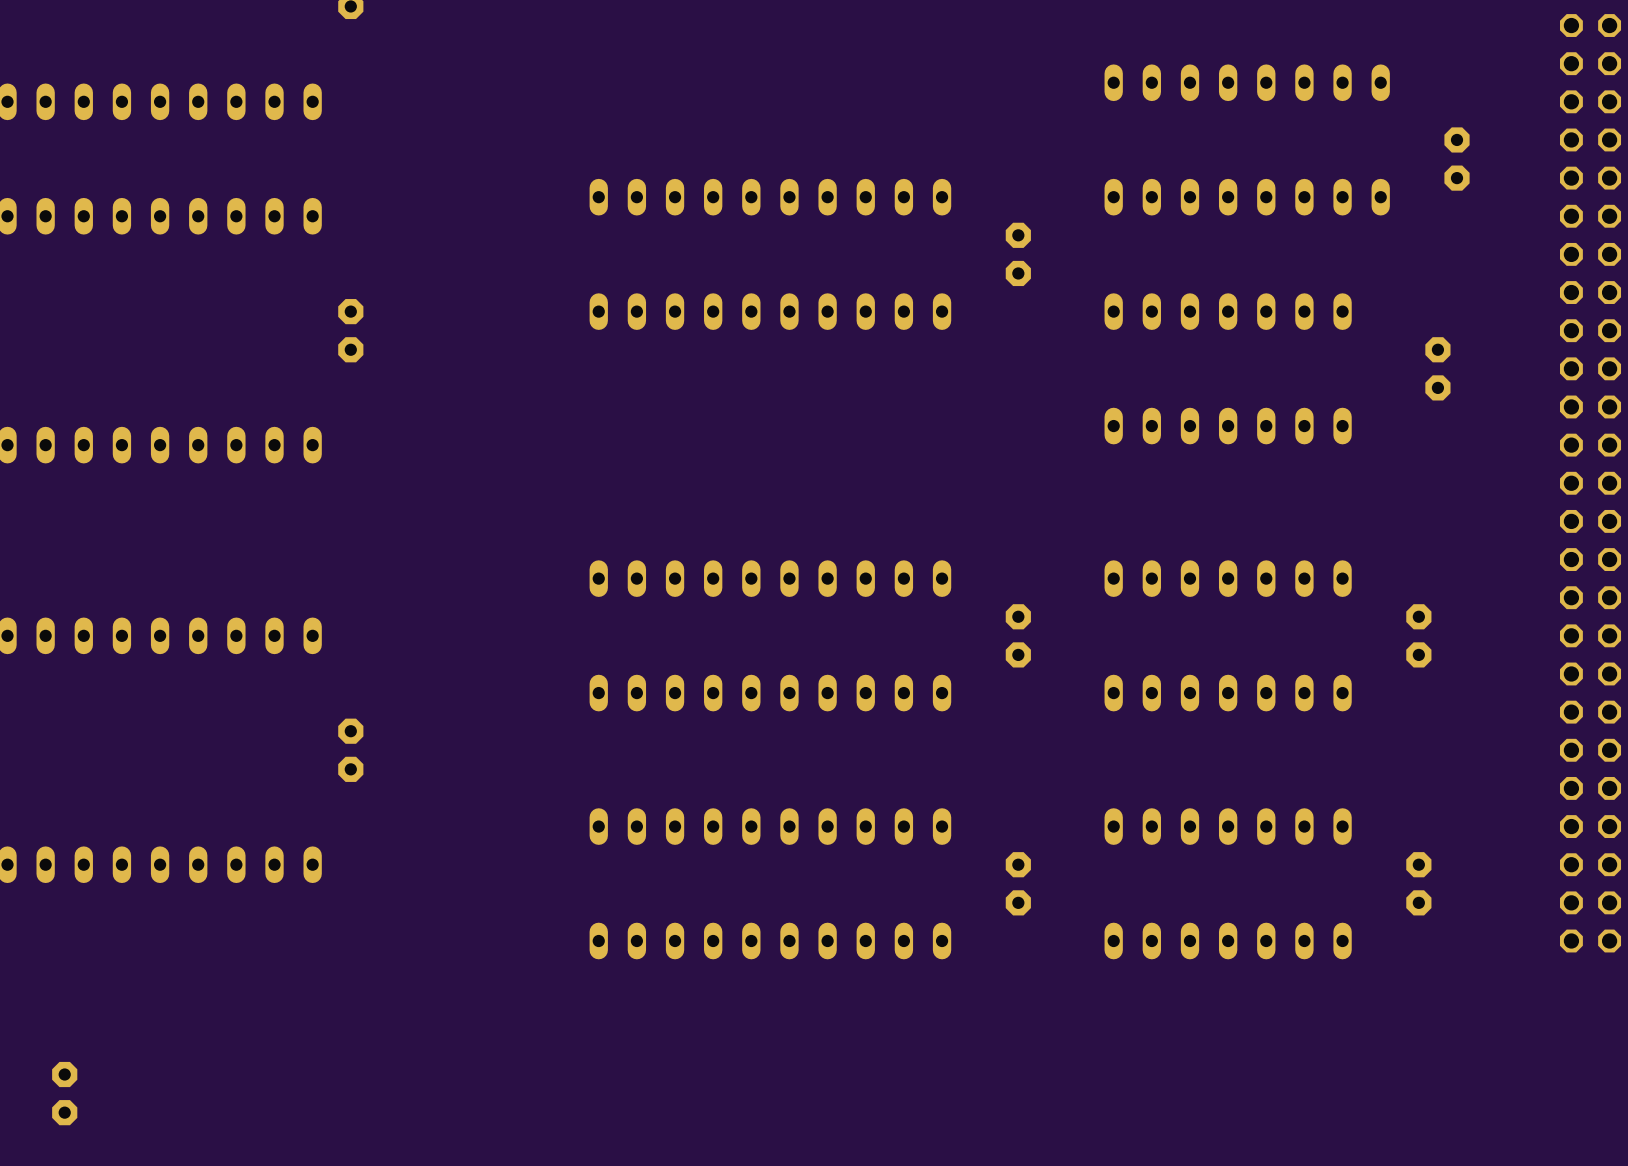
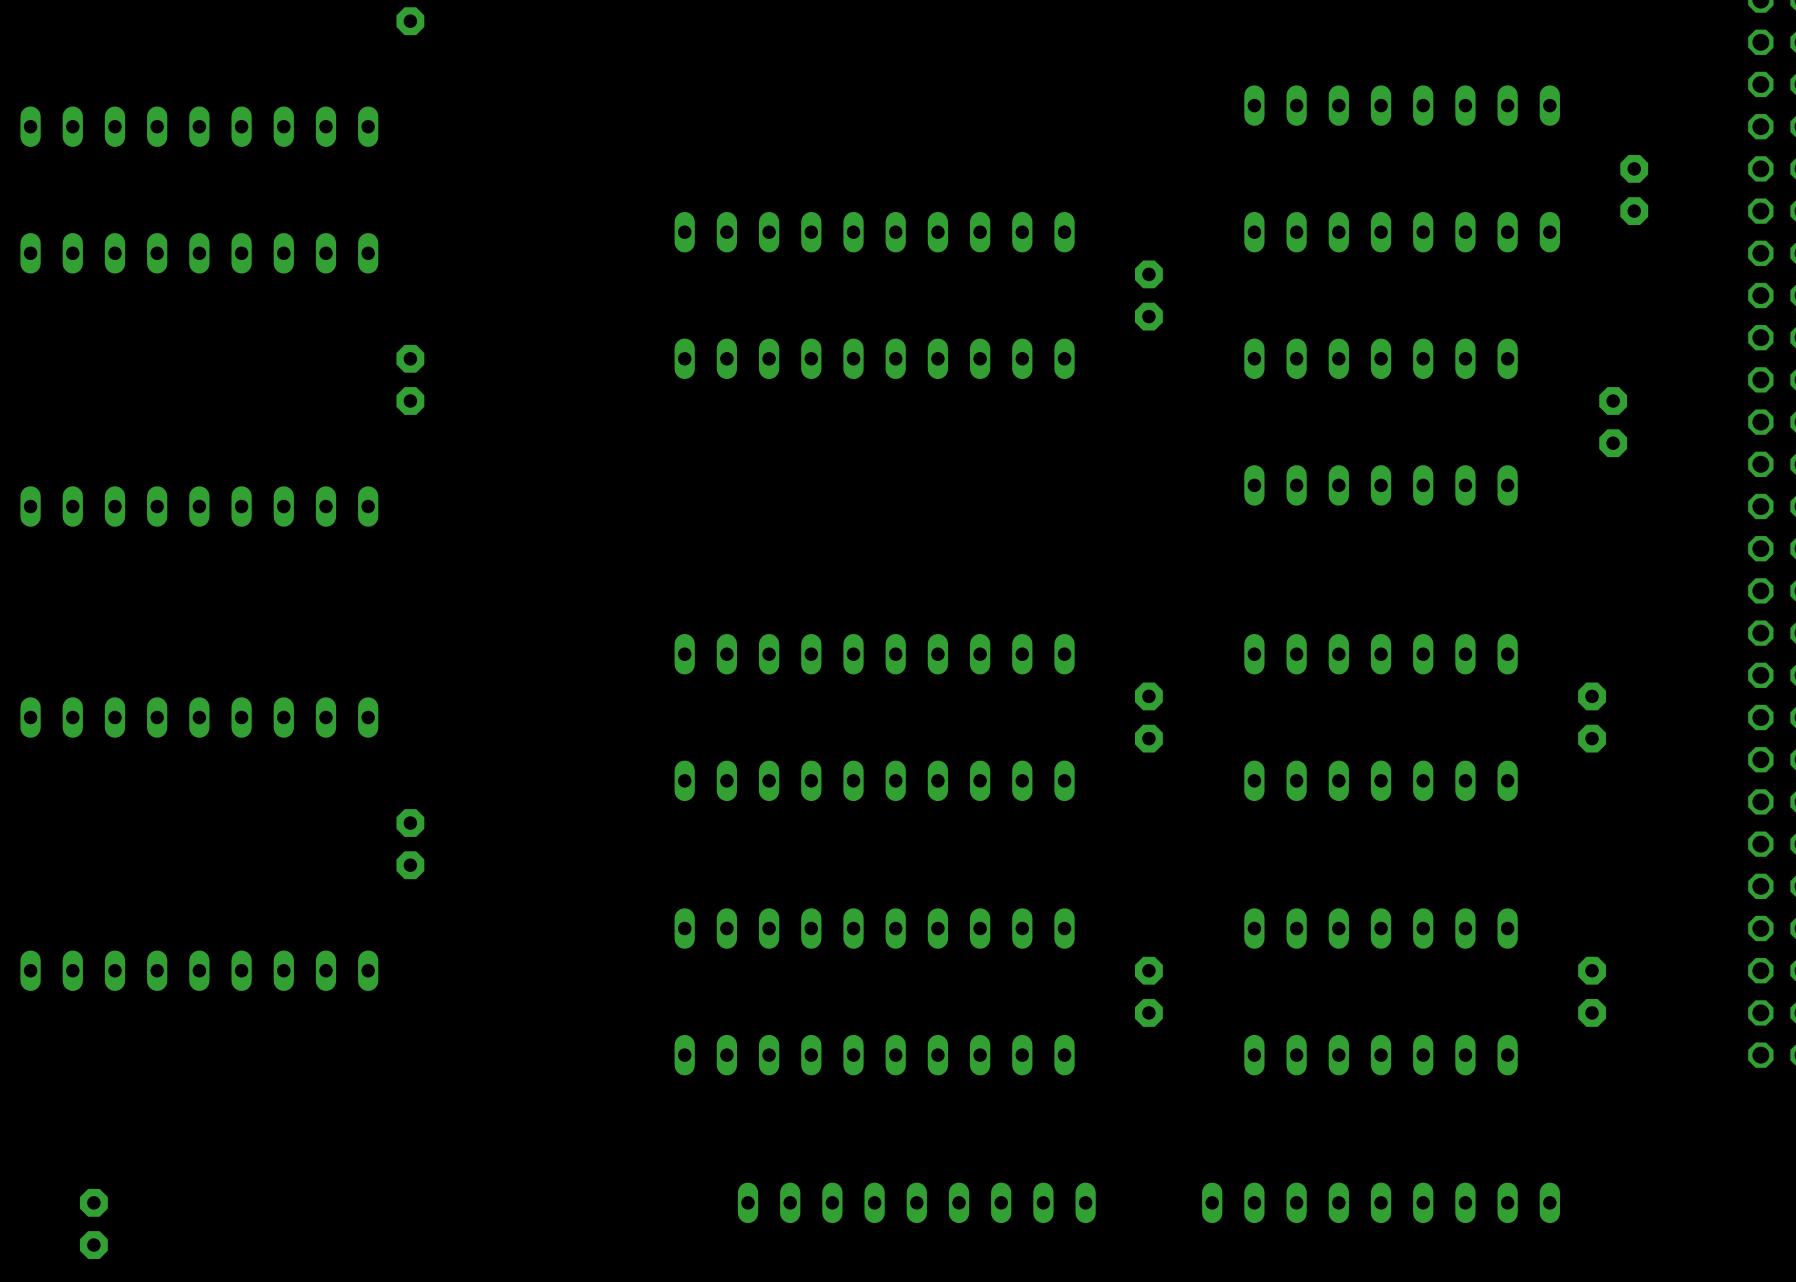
part: none -> (916, 1202)
part: none -> (1381, 1202)

